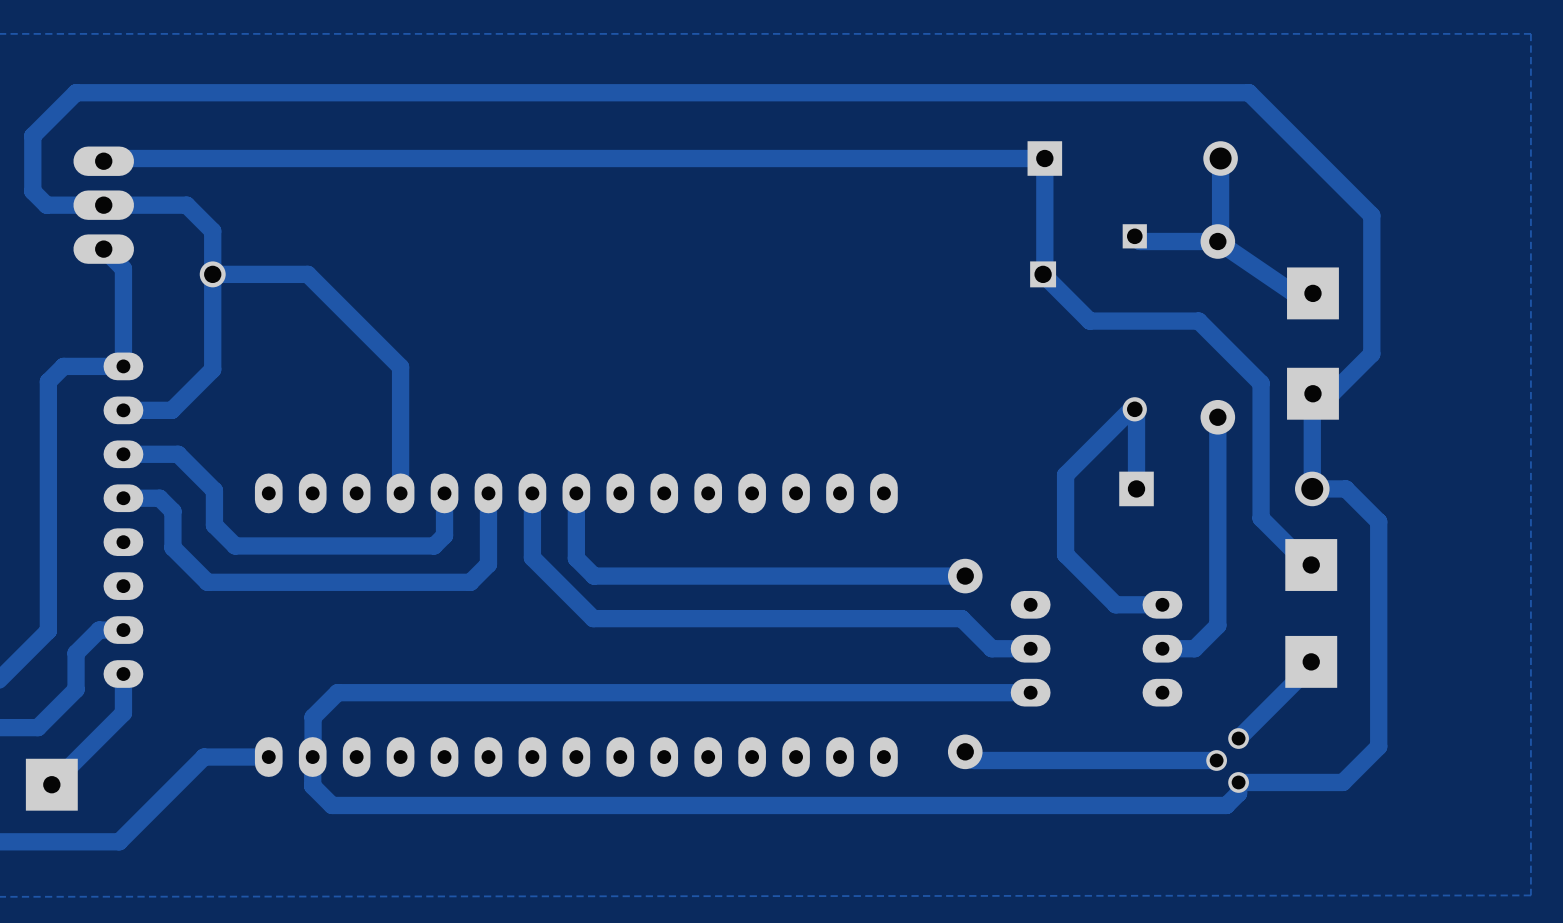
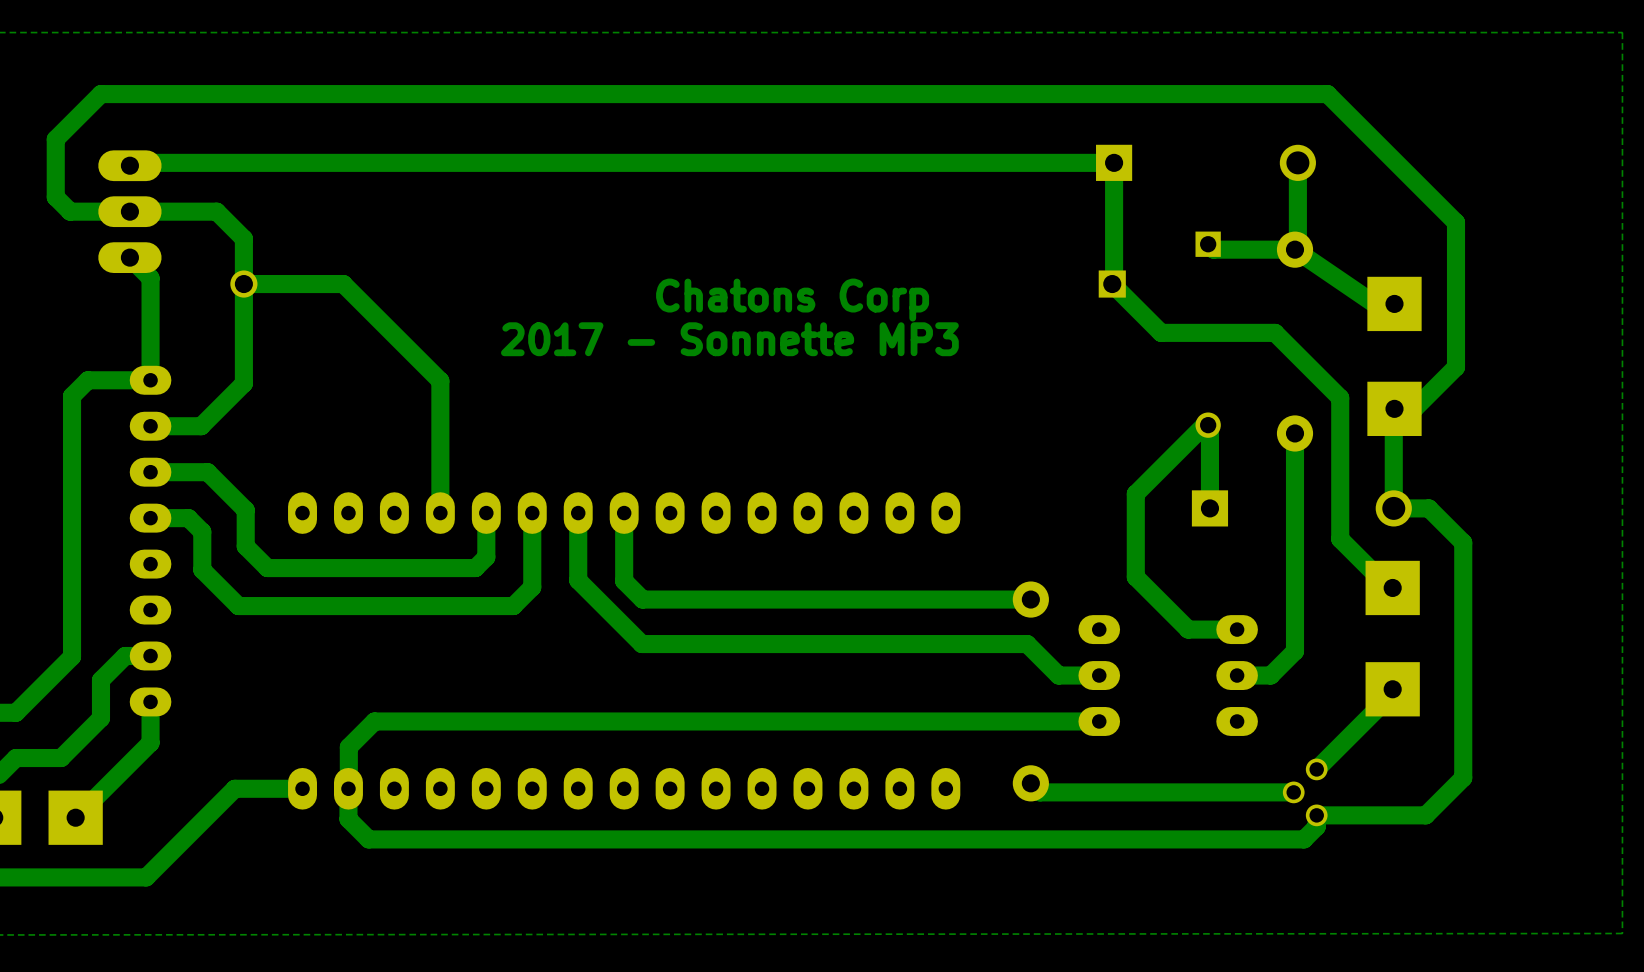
text: none -> Chatons Corp (792, 300)
text: none -> 2017 - Sonnette MP3 (729, 339)

